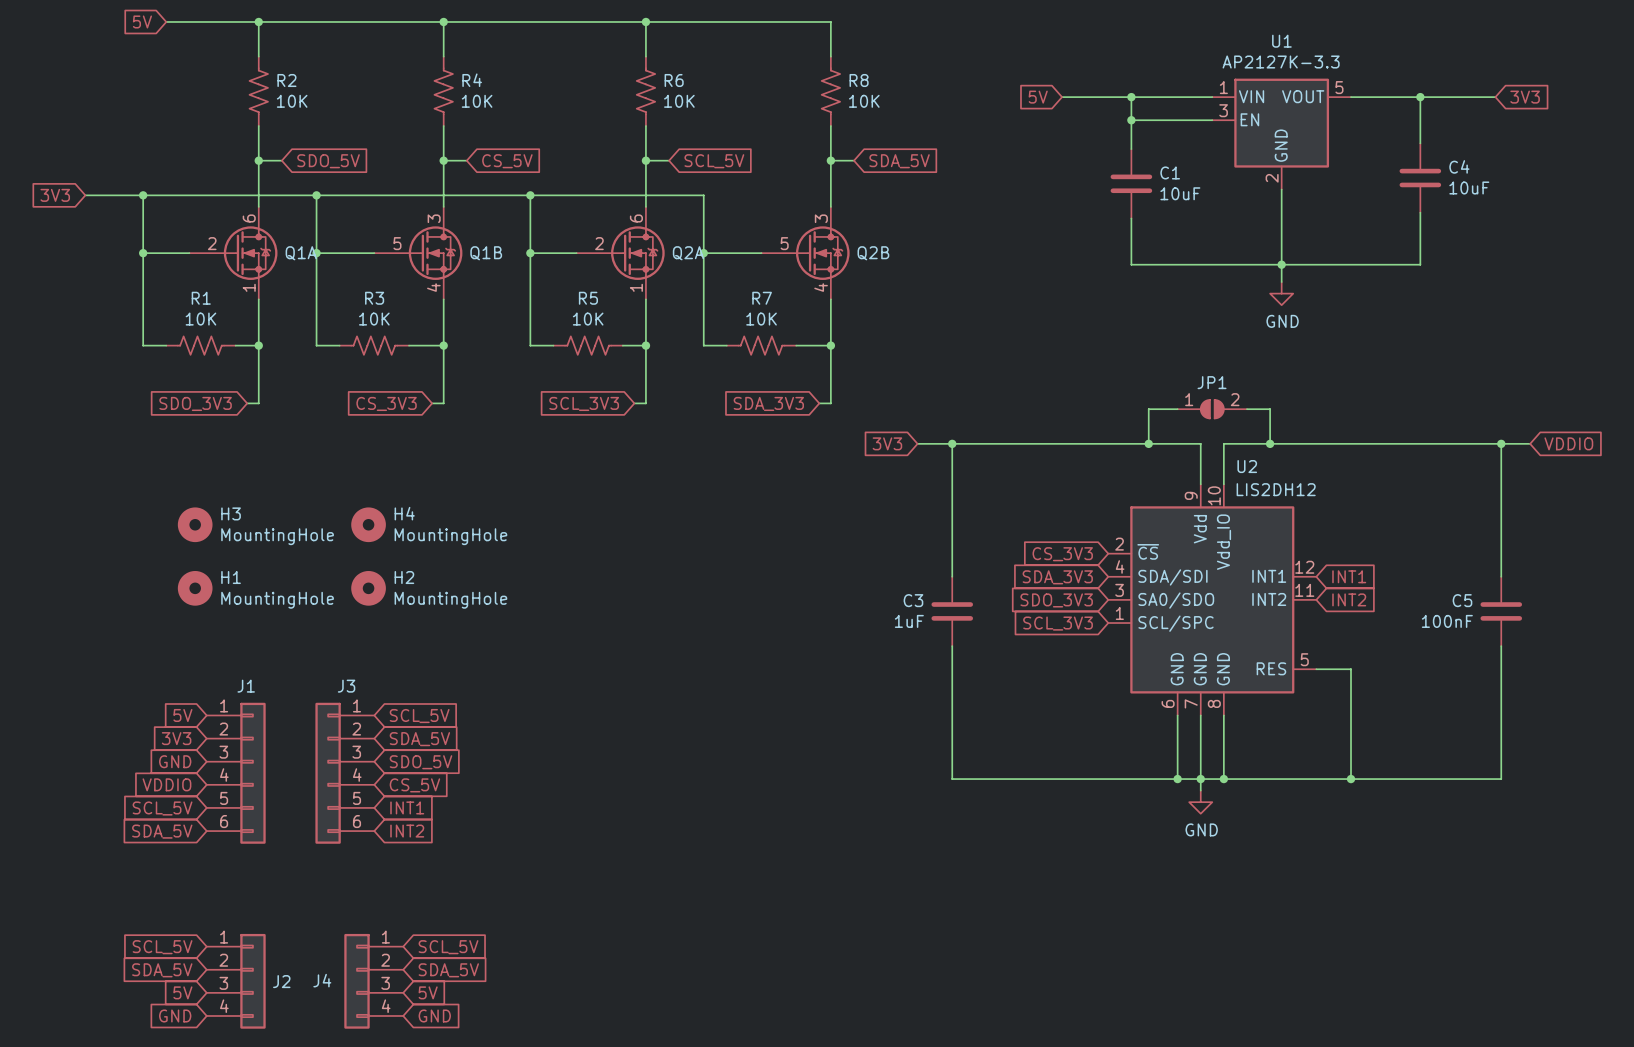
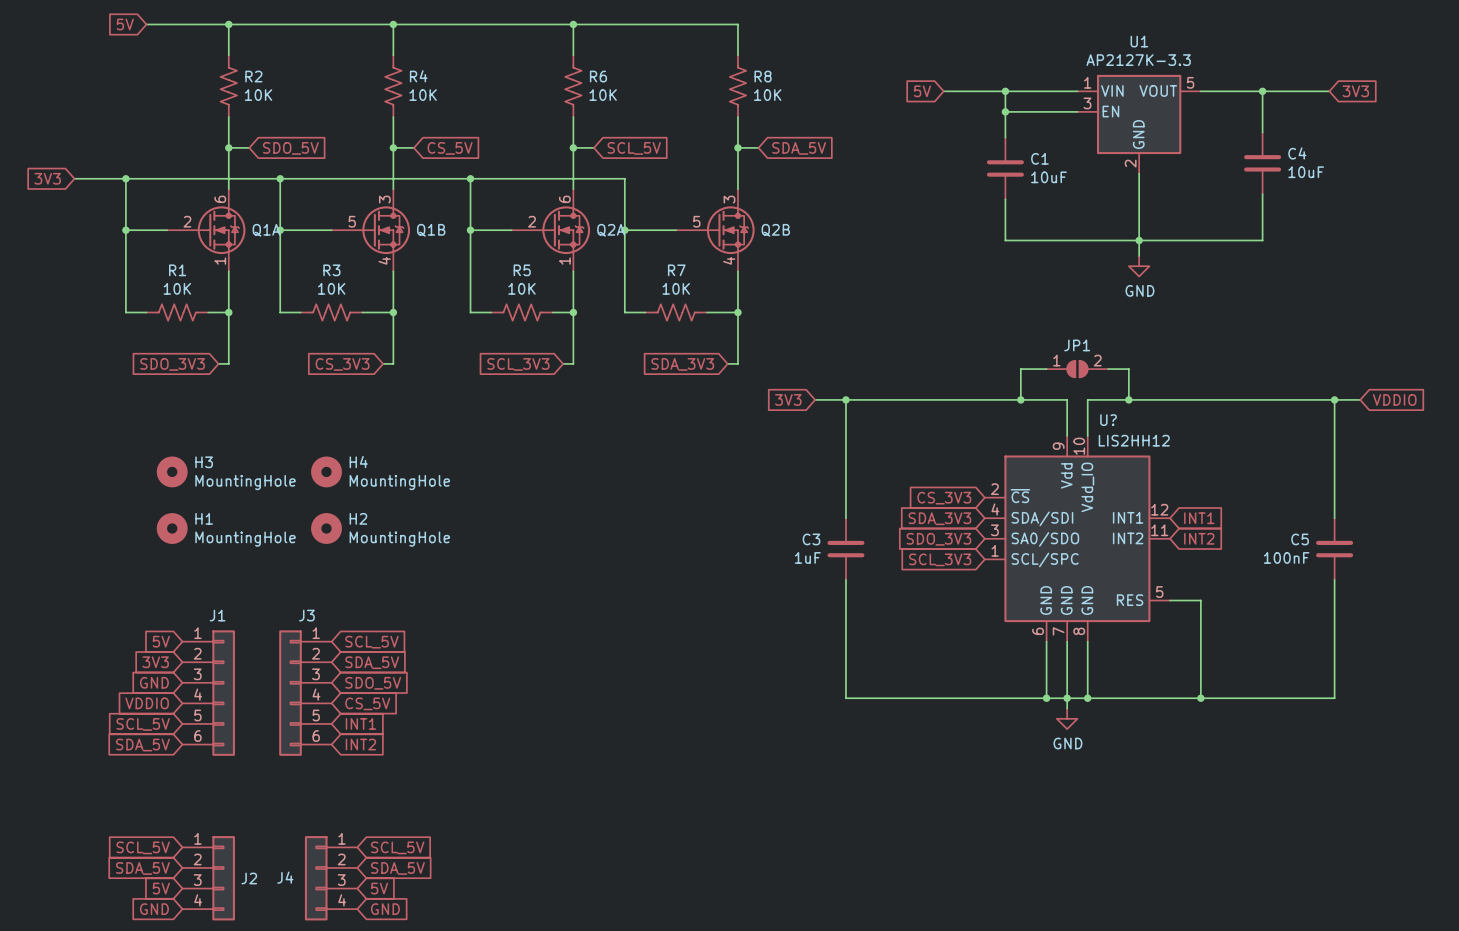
U2 name: U2 (1247, 466) -> U? (1108, 420)
U2 value: LIS2DH12 (1276, 489) -> LIS2HH12 (1134, 440)

